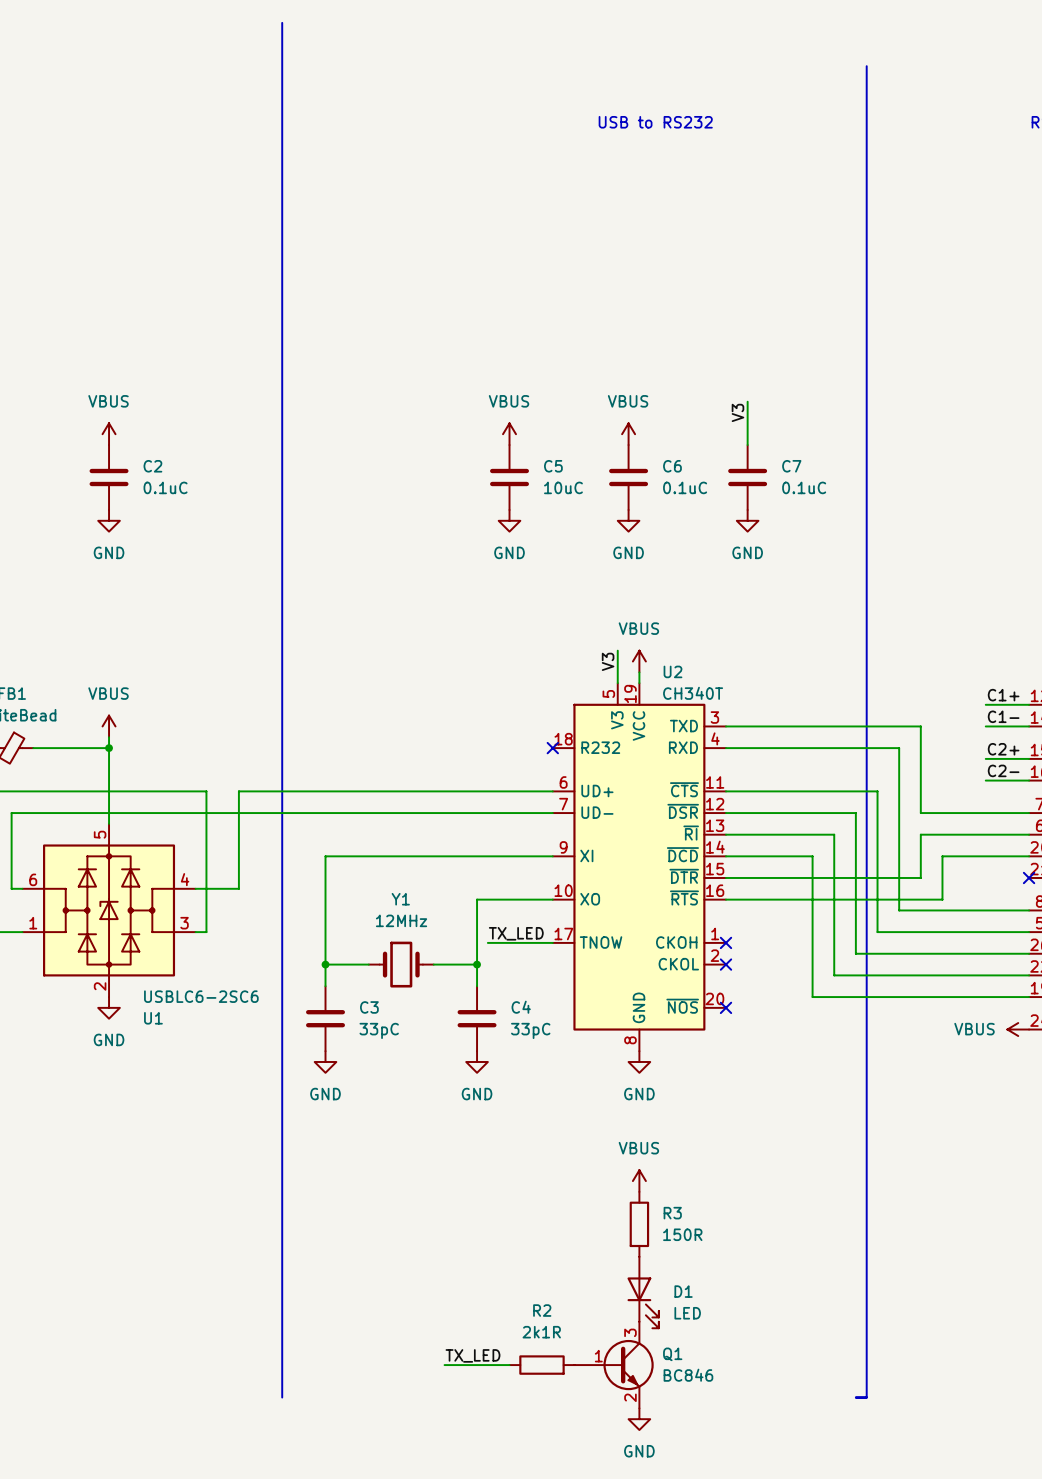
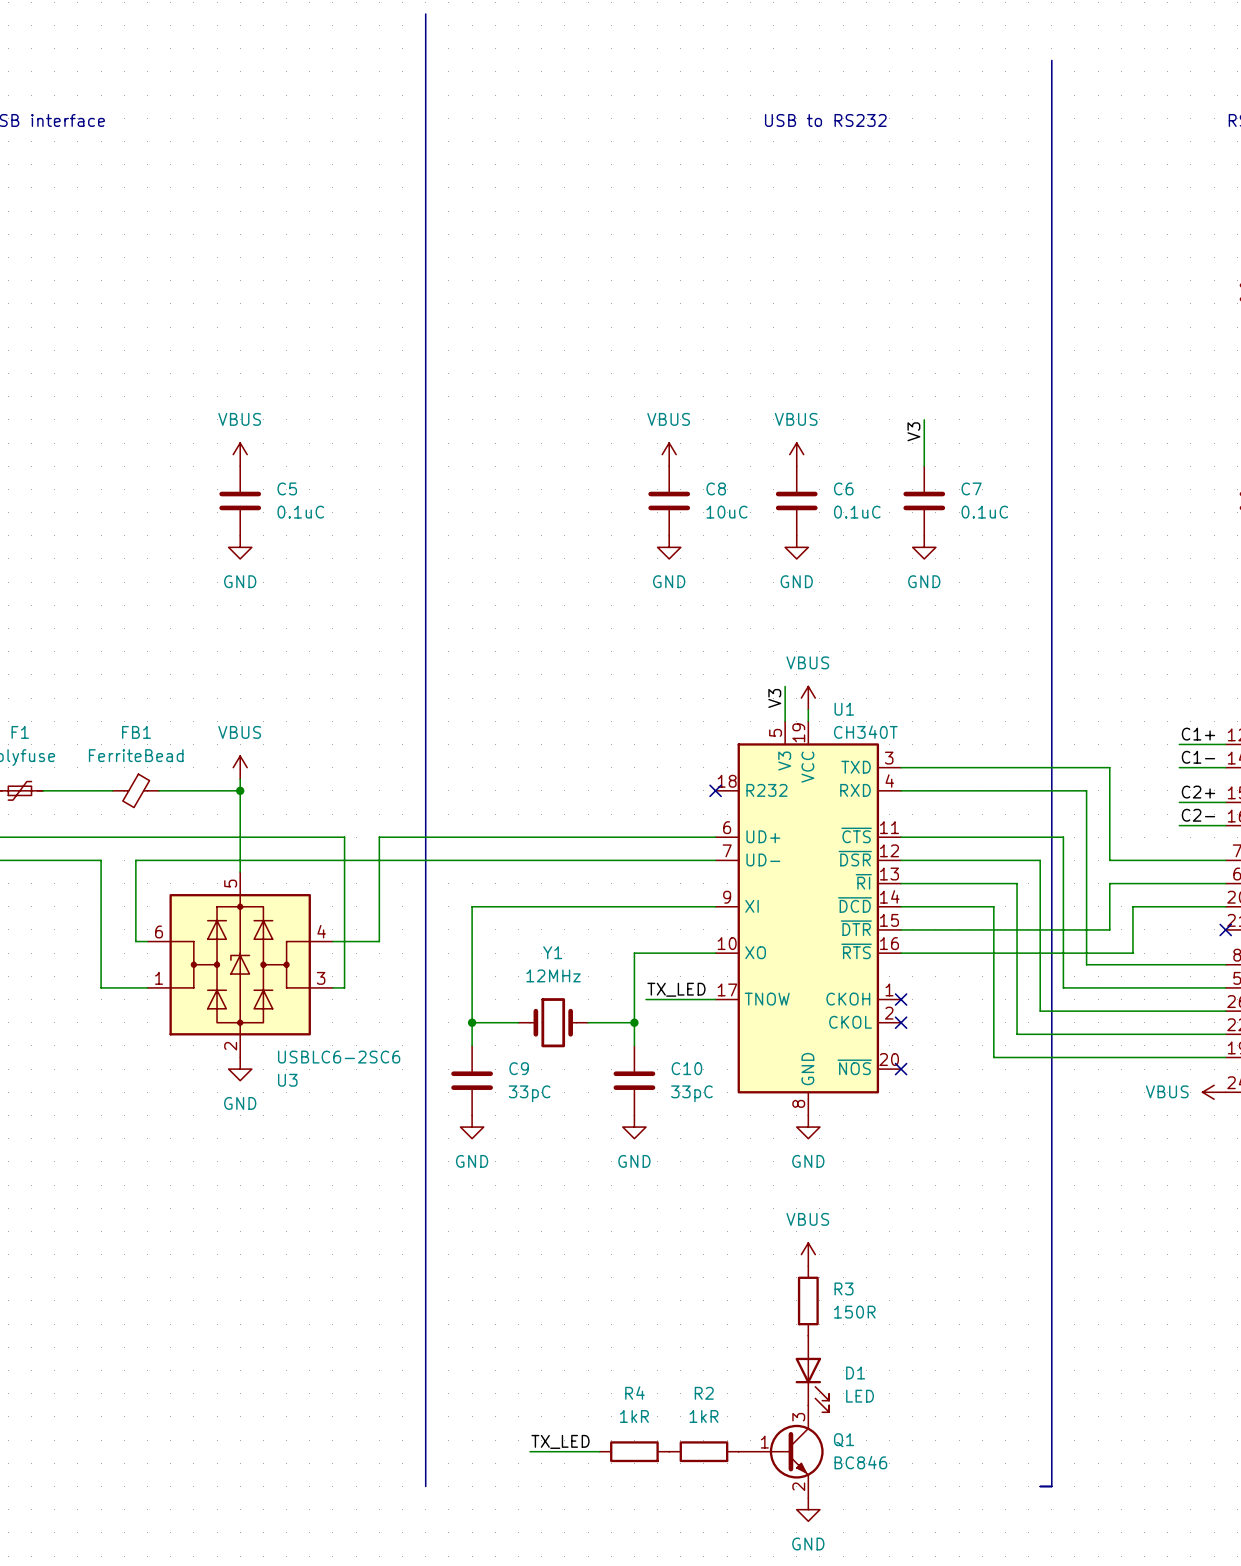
C2 name: C2 (152, 466) -> C5 (287, 488)
C5 name: C5 (553, 466) -> C8 (716, 488)
U2 name: U2 (672, 671) -> U1 (844, 709)
C3 name: C3 (369, 1007) -> C9 (519, 1068)
C4 name: C4 (521, 1007) -> C10 (686, 1068)
U1 name: U1 (153, 1018) -> U3 (287, 1080)
R2 value: 2k1R (541, 1332) -> 1kR (703, 1416)
label position: TX_LED (473, 1355) -> TX_LED (560, 1441)
wire: (444, 1365) (509, 1365) -> (599, 1451) (530, 1451)
R4: none -> 1kR (634, 1451)

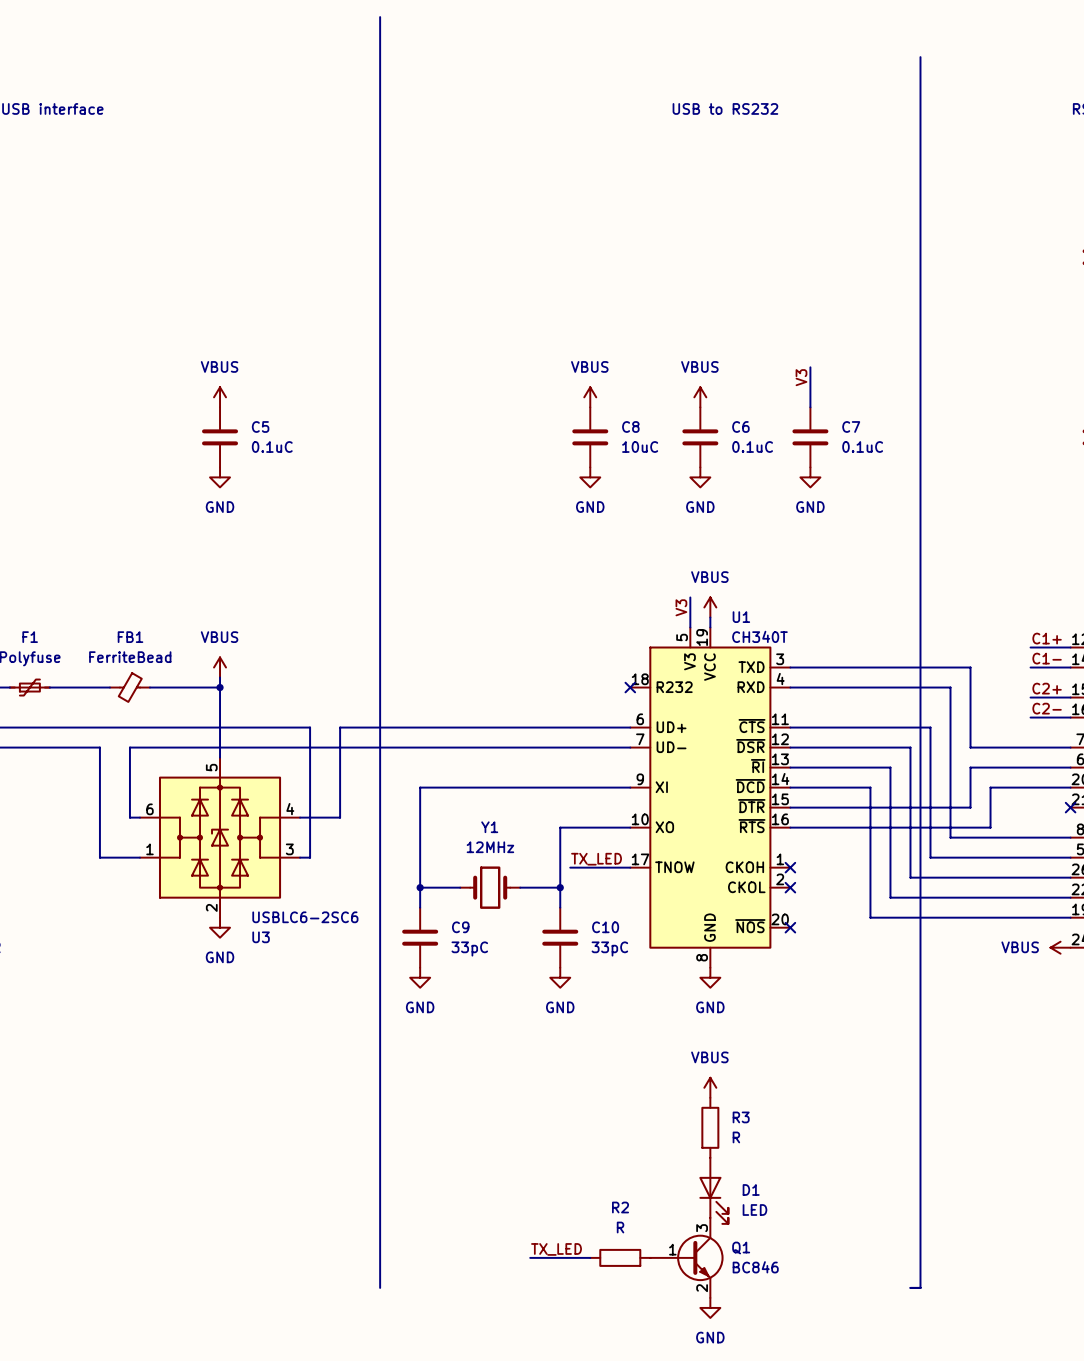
R3 value: 150R (854, 1312) -> R (736, 1137)
R2 value: 1kR (703, 1416) -> R (620, 1227)
label position: TX_LED (560, 1441) -> TX_LED (556, 1249)
wire: (530, 1451) (599, 1451) -> (590, 1257) (530, 1257)
R4: 1kR (634, 1451) -> none

